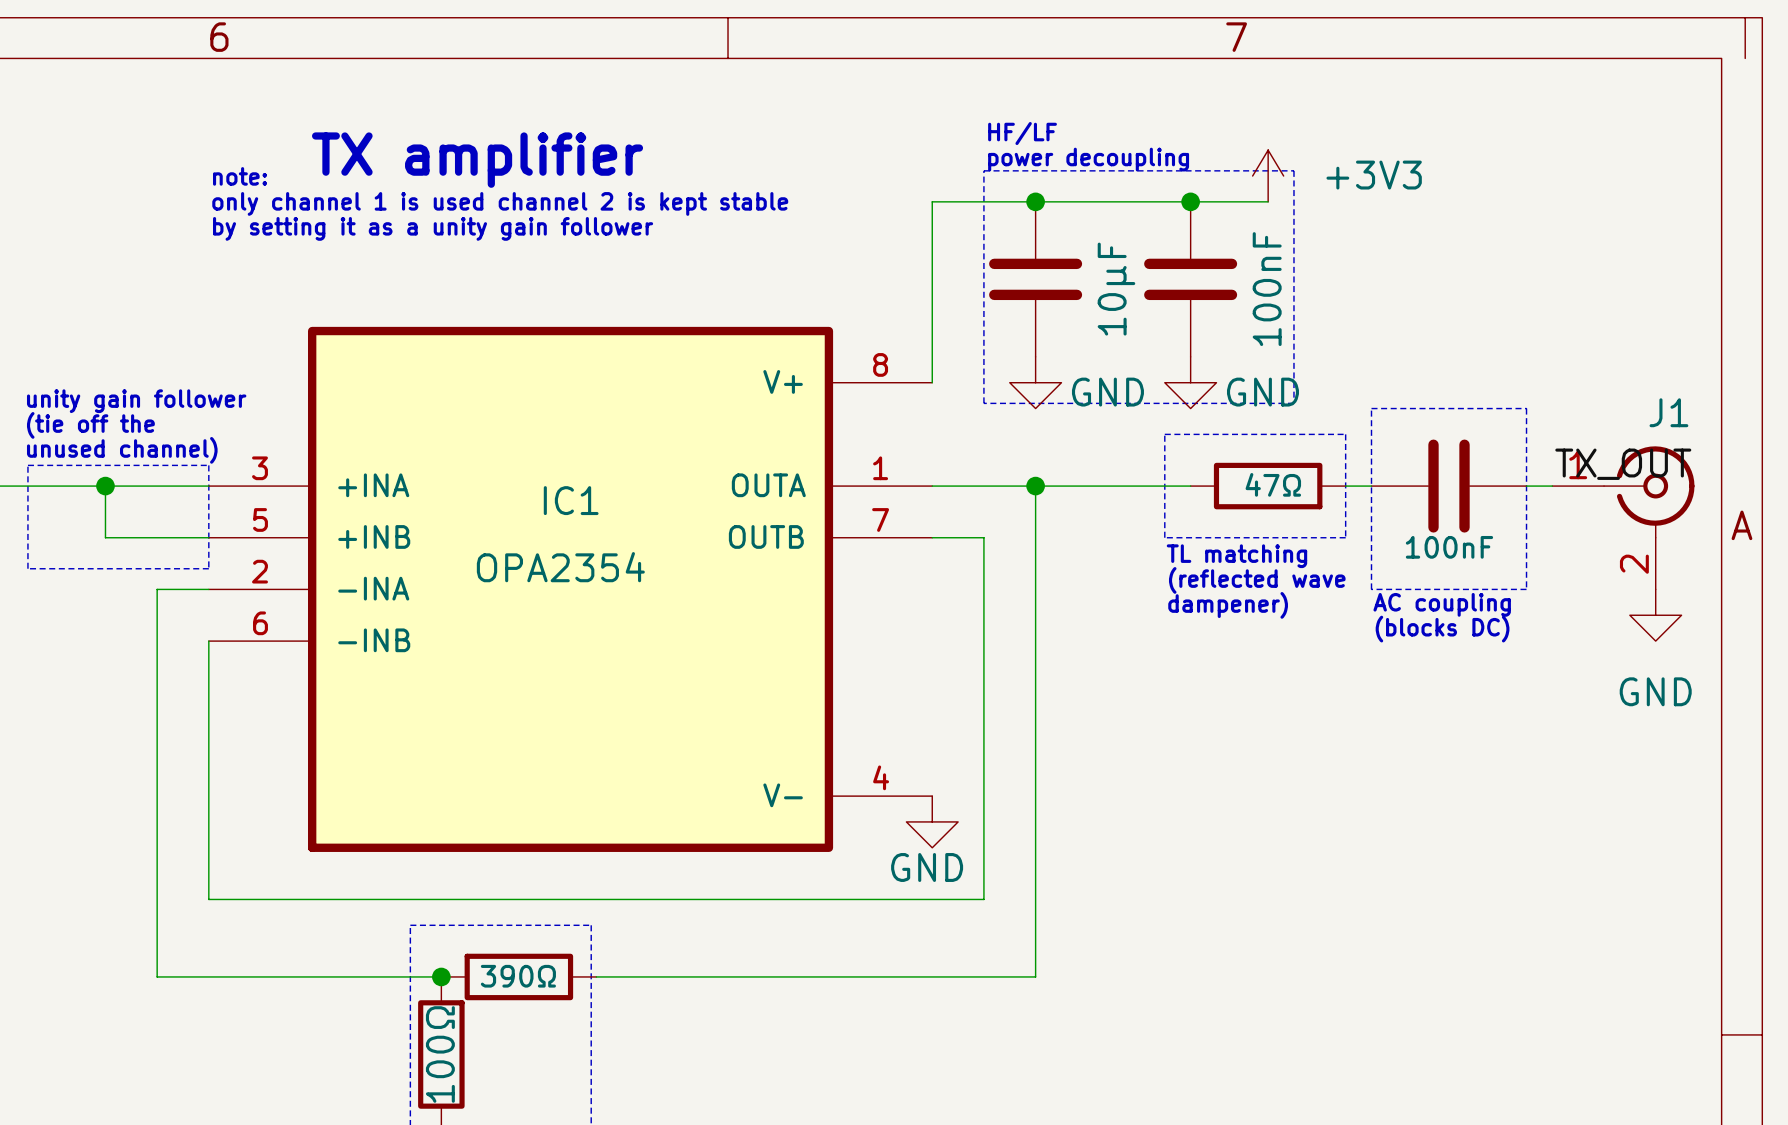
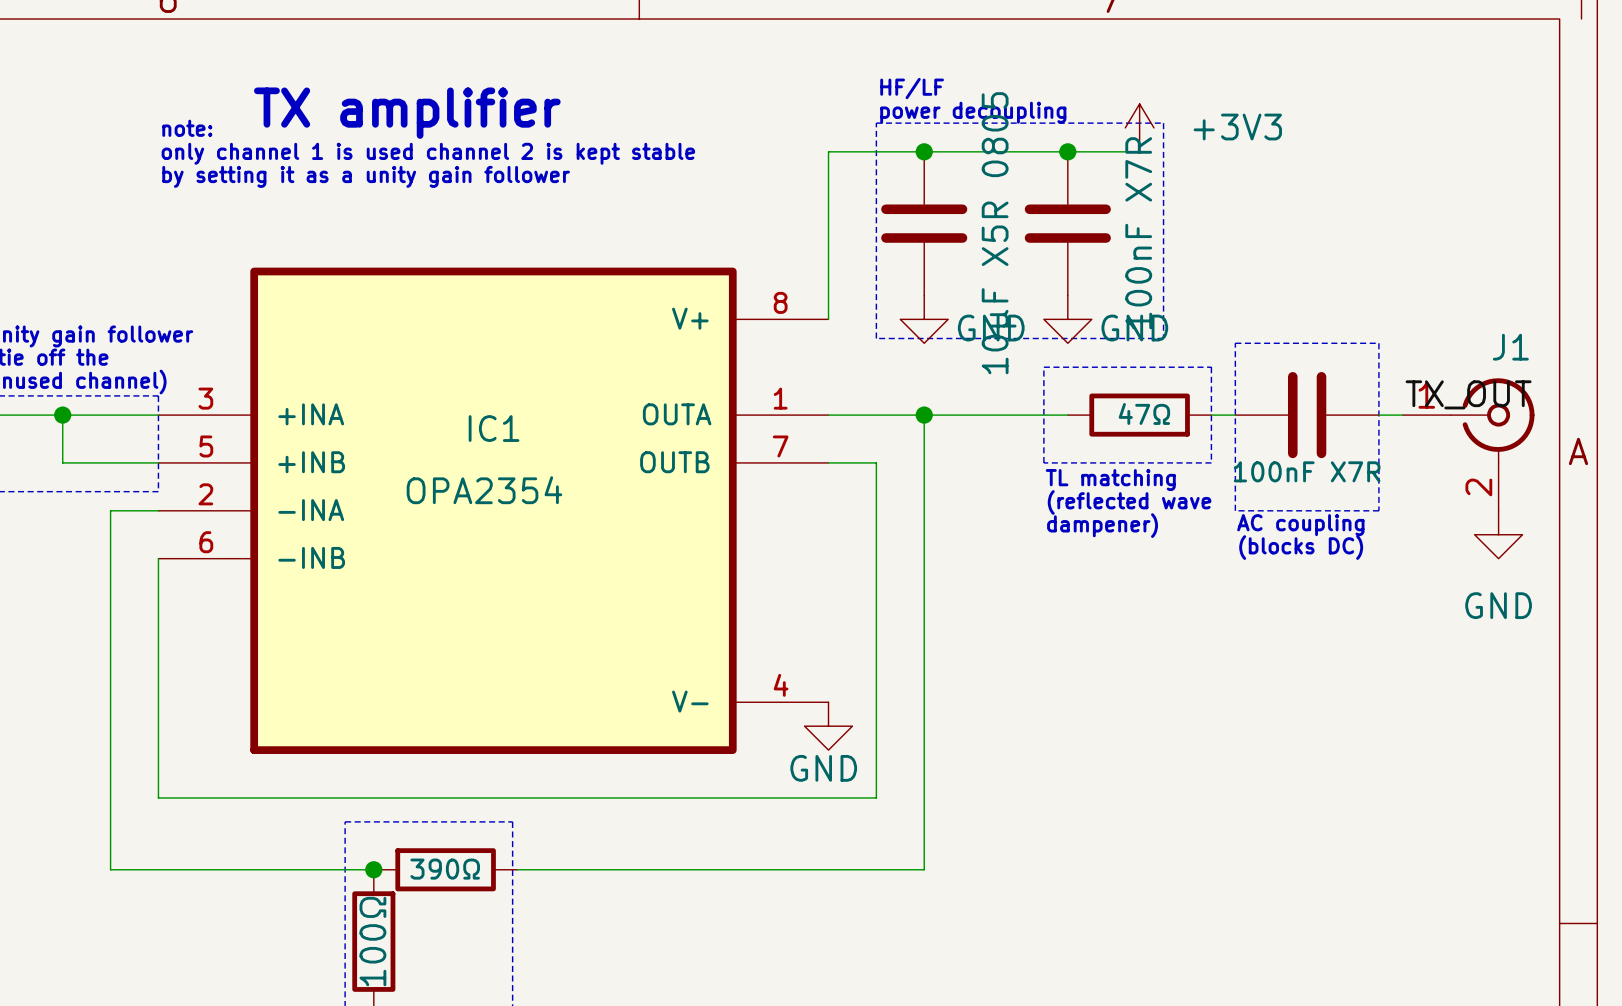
part value: 10µF (1116, 289) -> 10µF X5R 0805 (999, 233)
part value: 100nF (1267, 289) -> 100nF X7R (1138, 233)
part value: 100nF (1449, 547) -> 100nF X7R (1307, 471)

